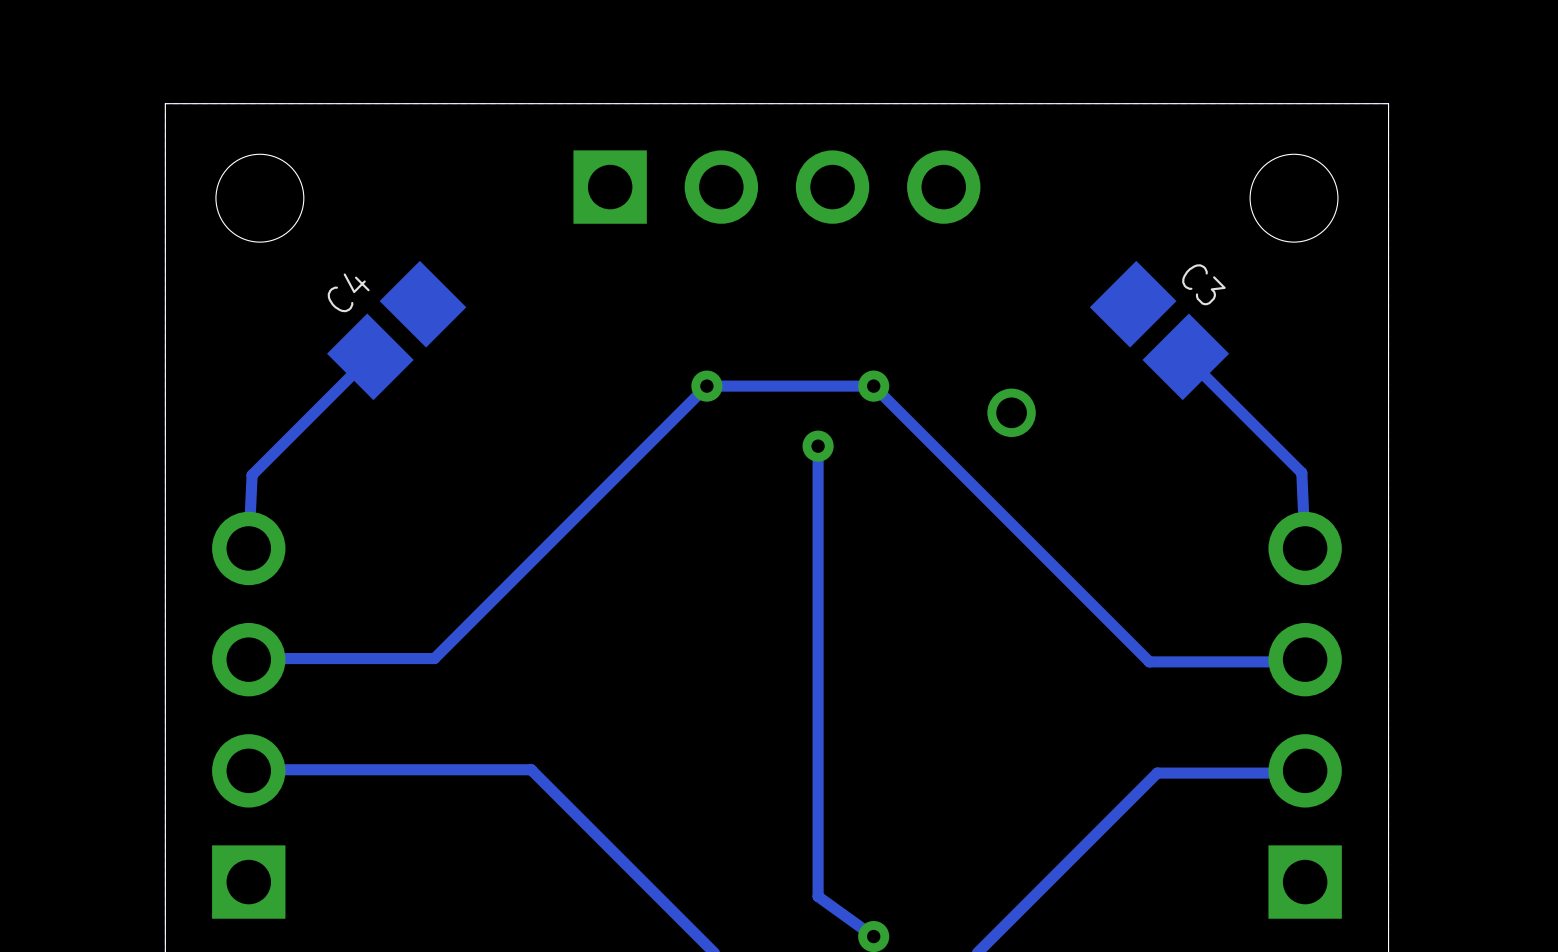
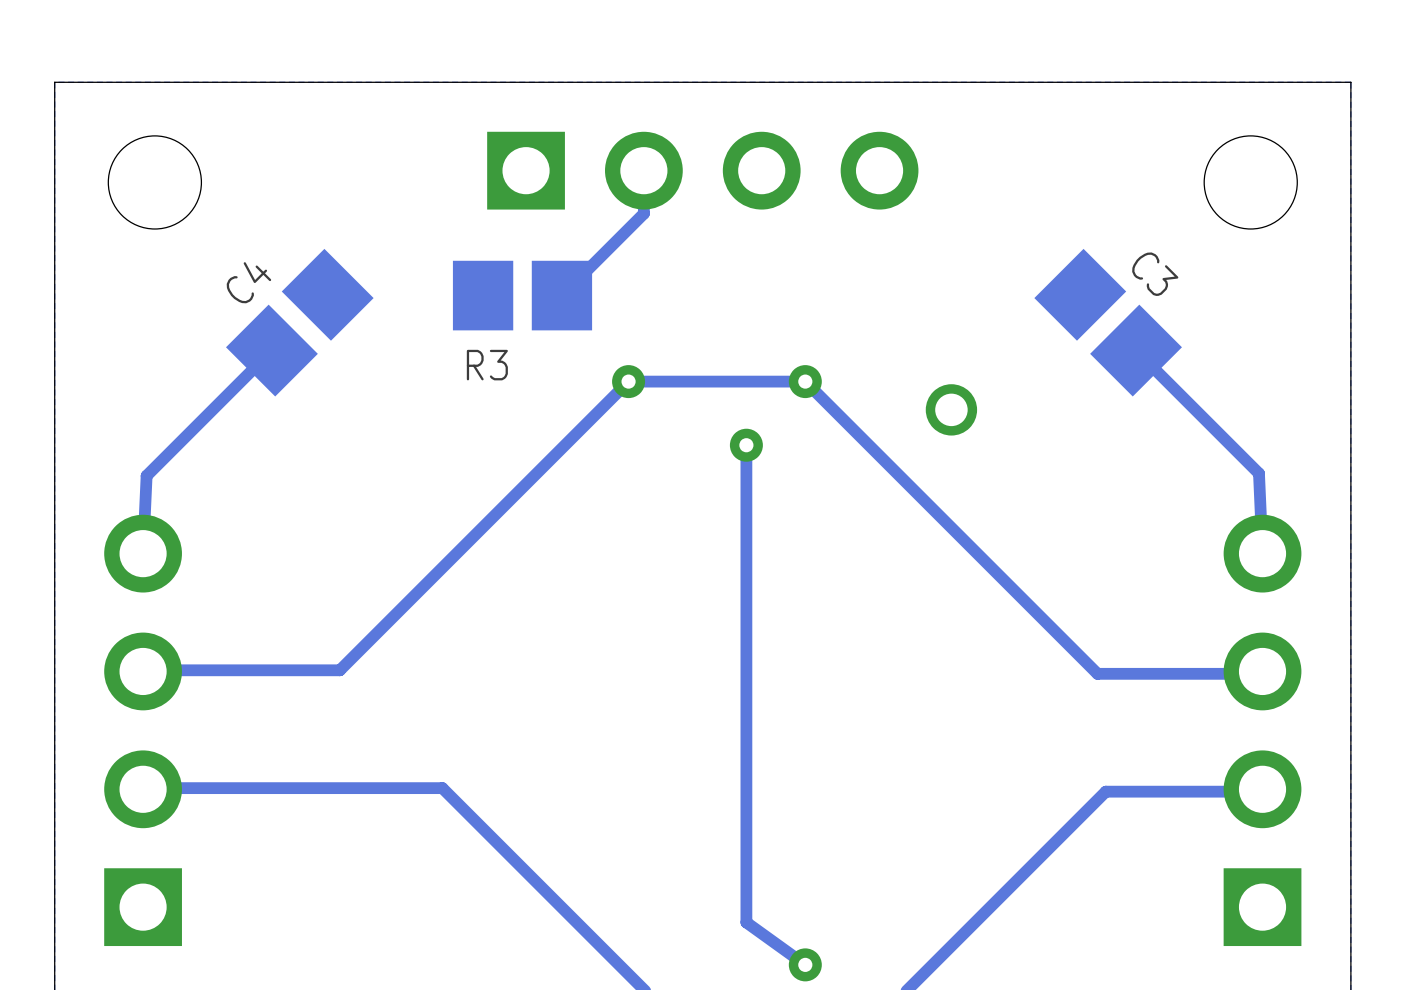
track: none -> (643, 170) (643, 213) (561, 295)
R3: none -> (522, 295)

